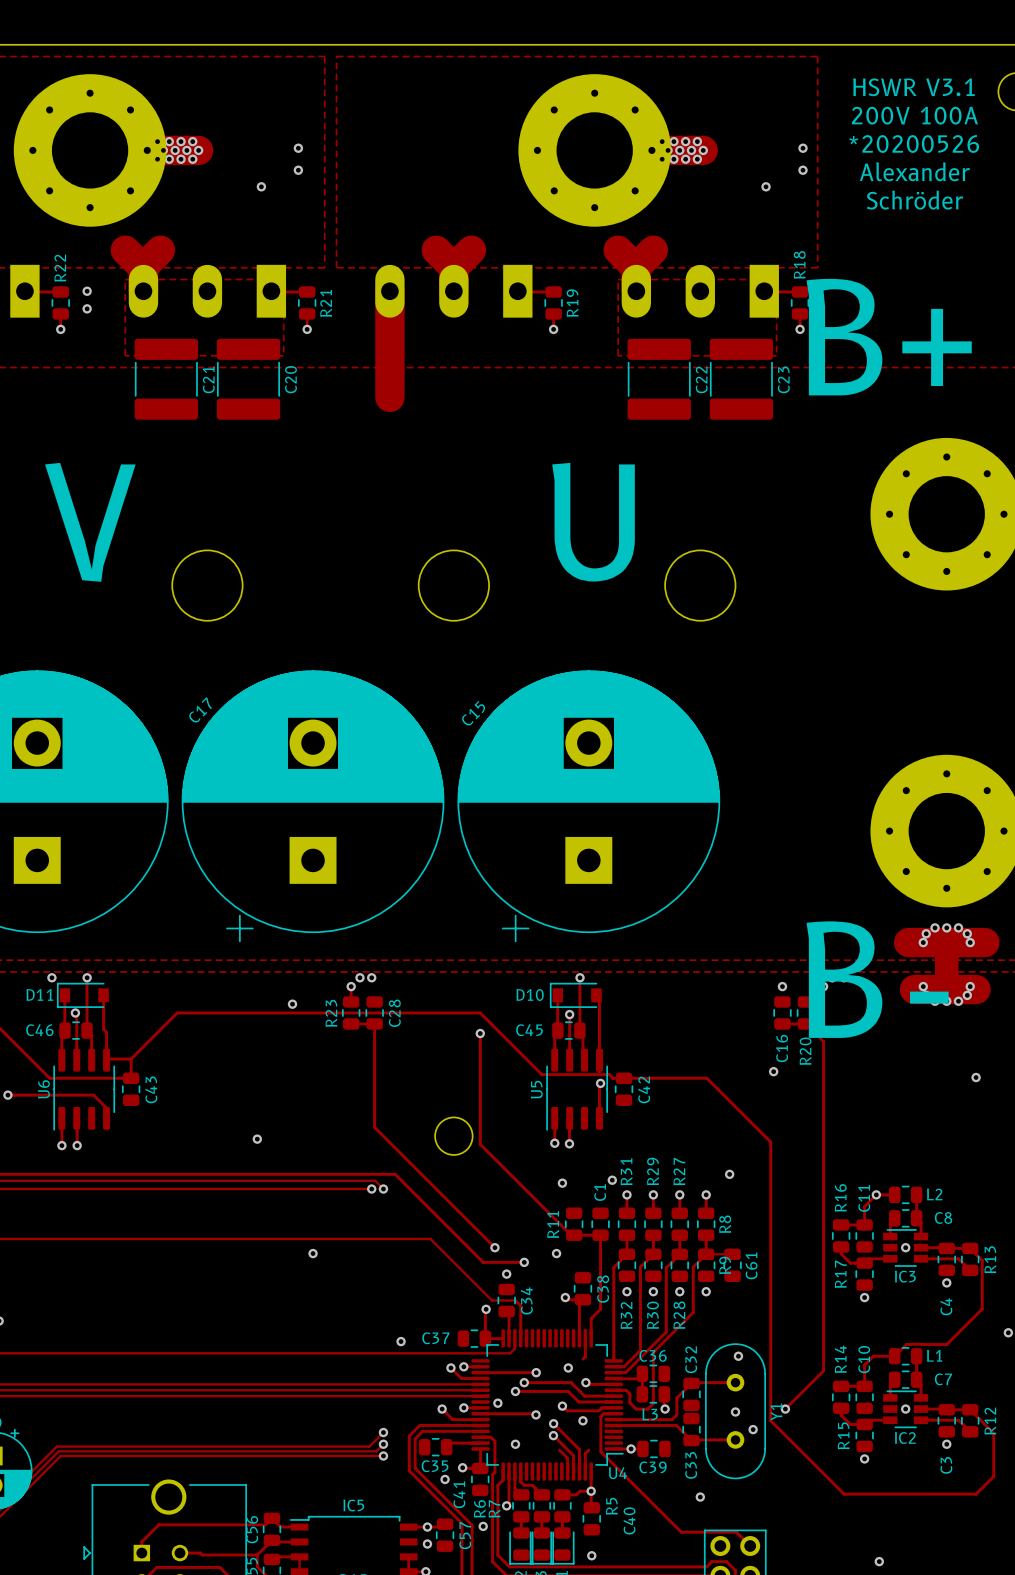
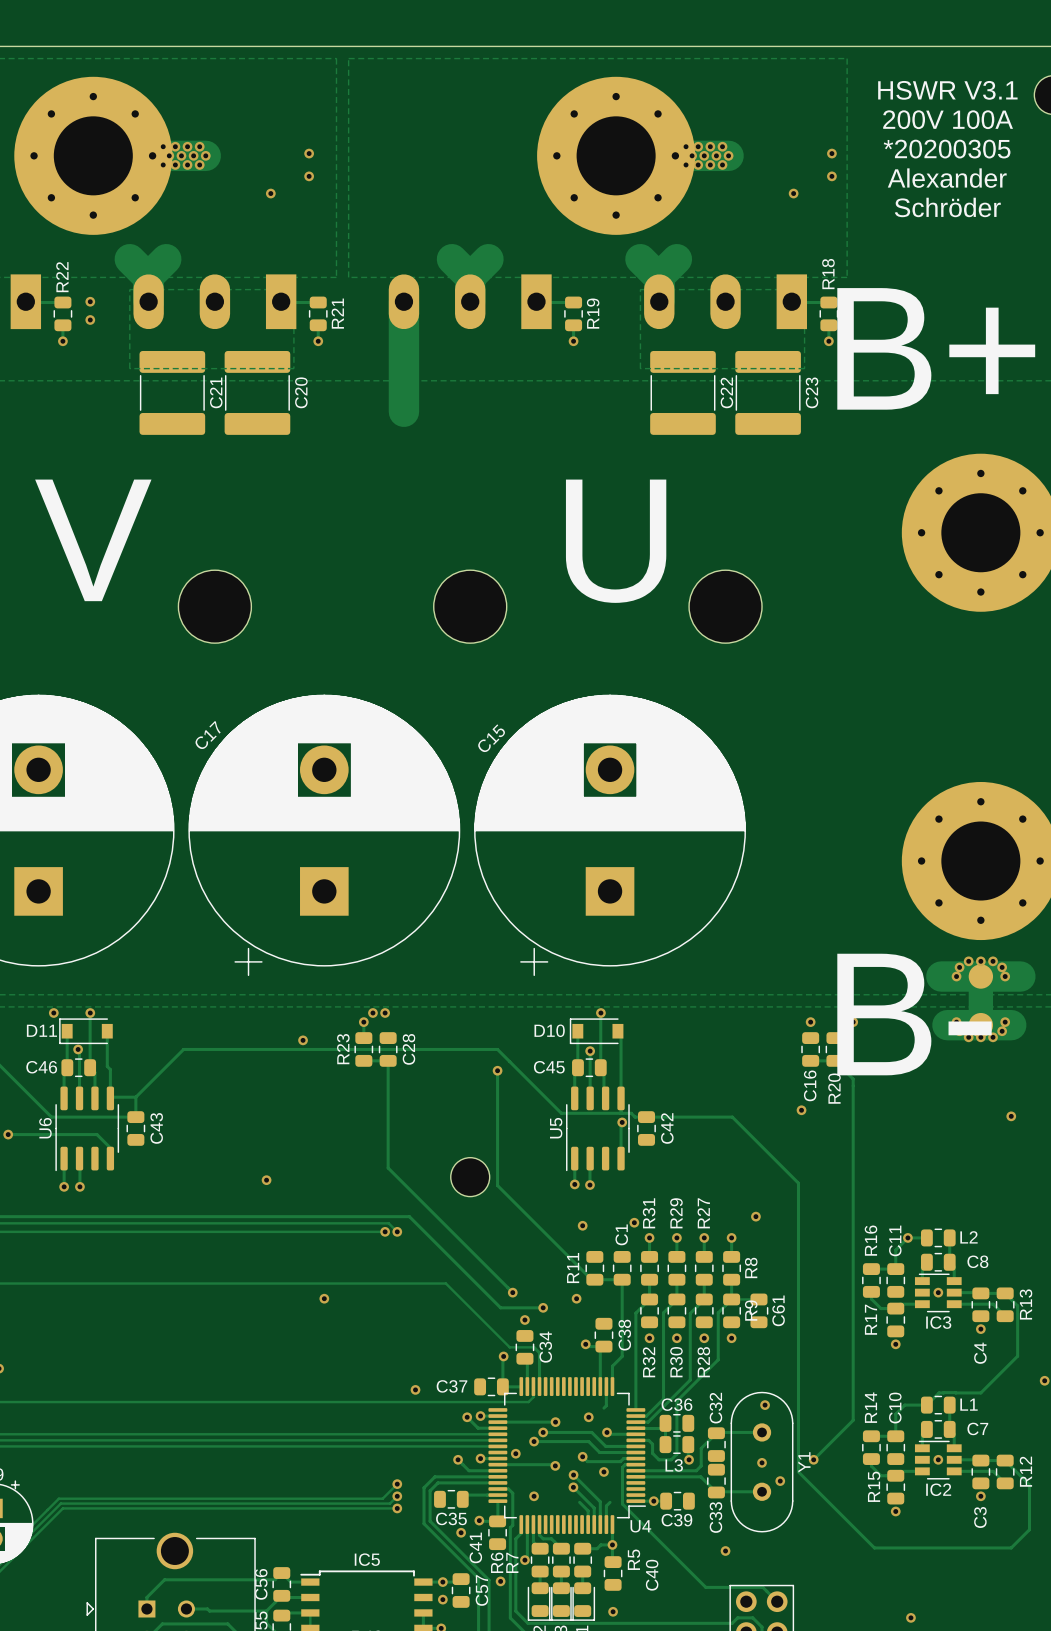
text: *20200526 (914, 144) -> *20200305 (947, 149)

